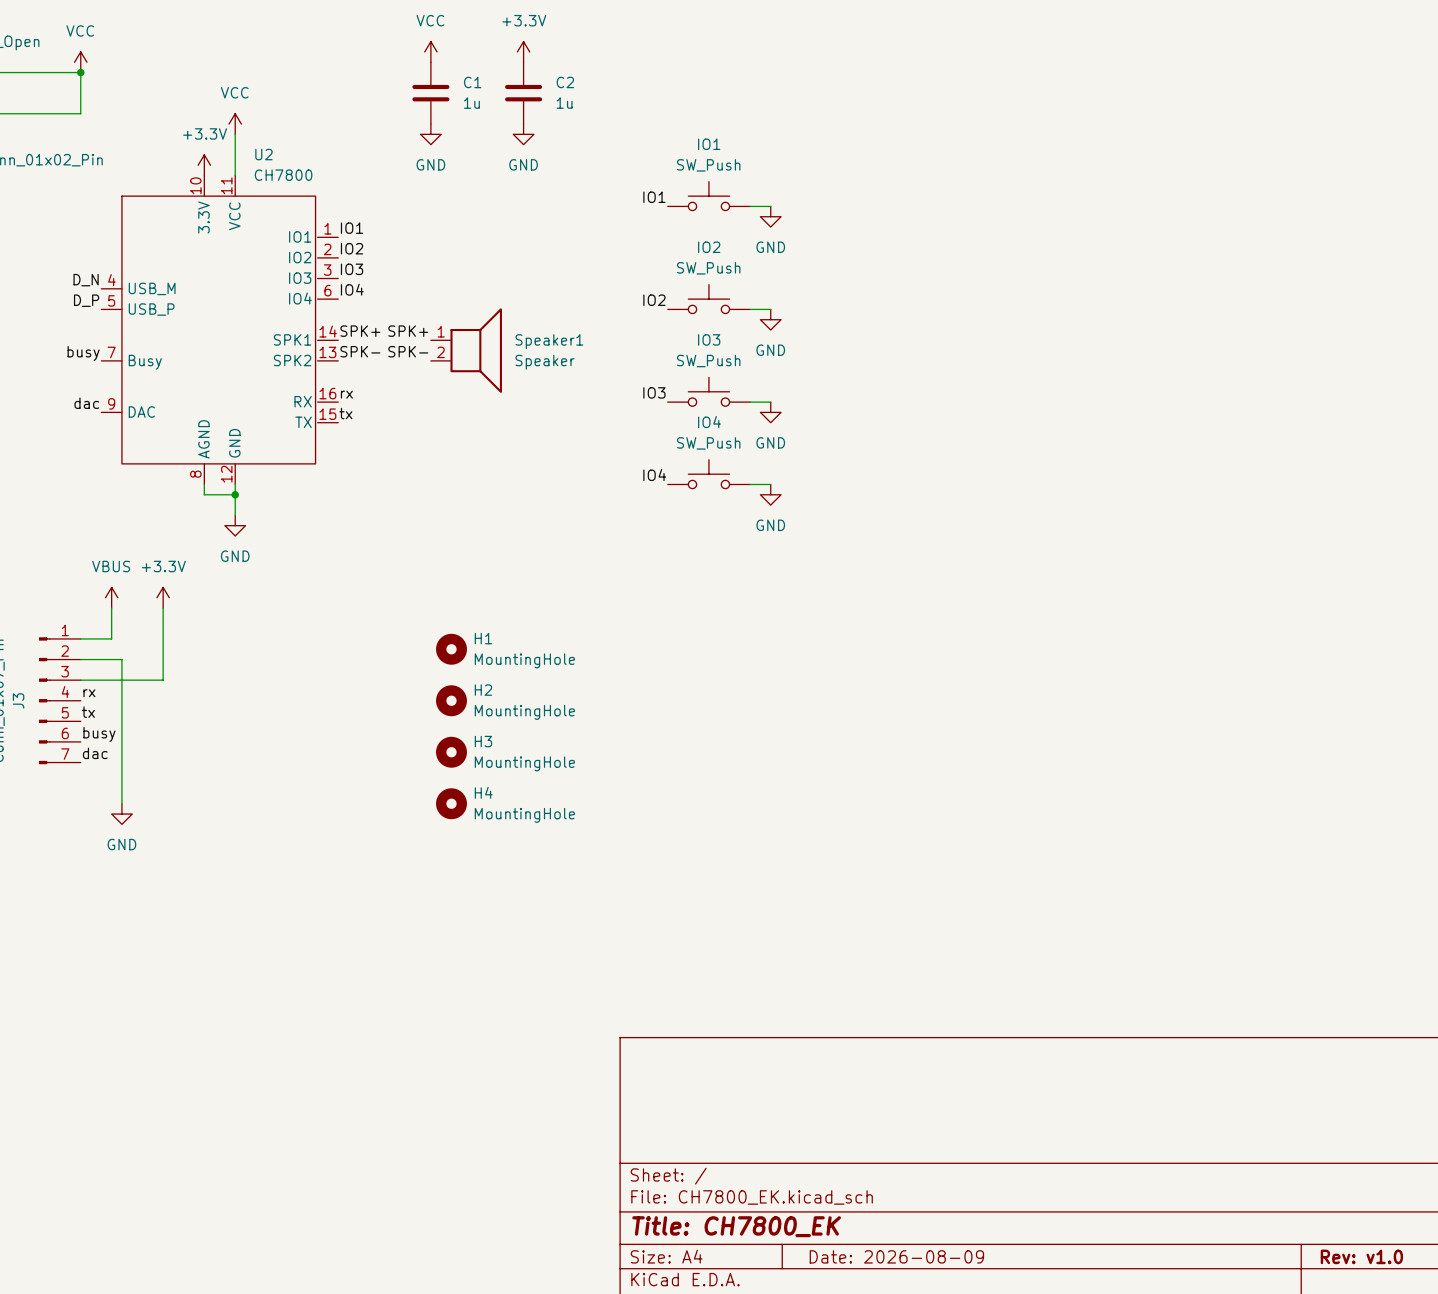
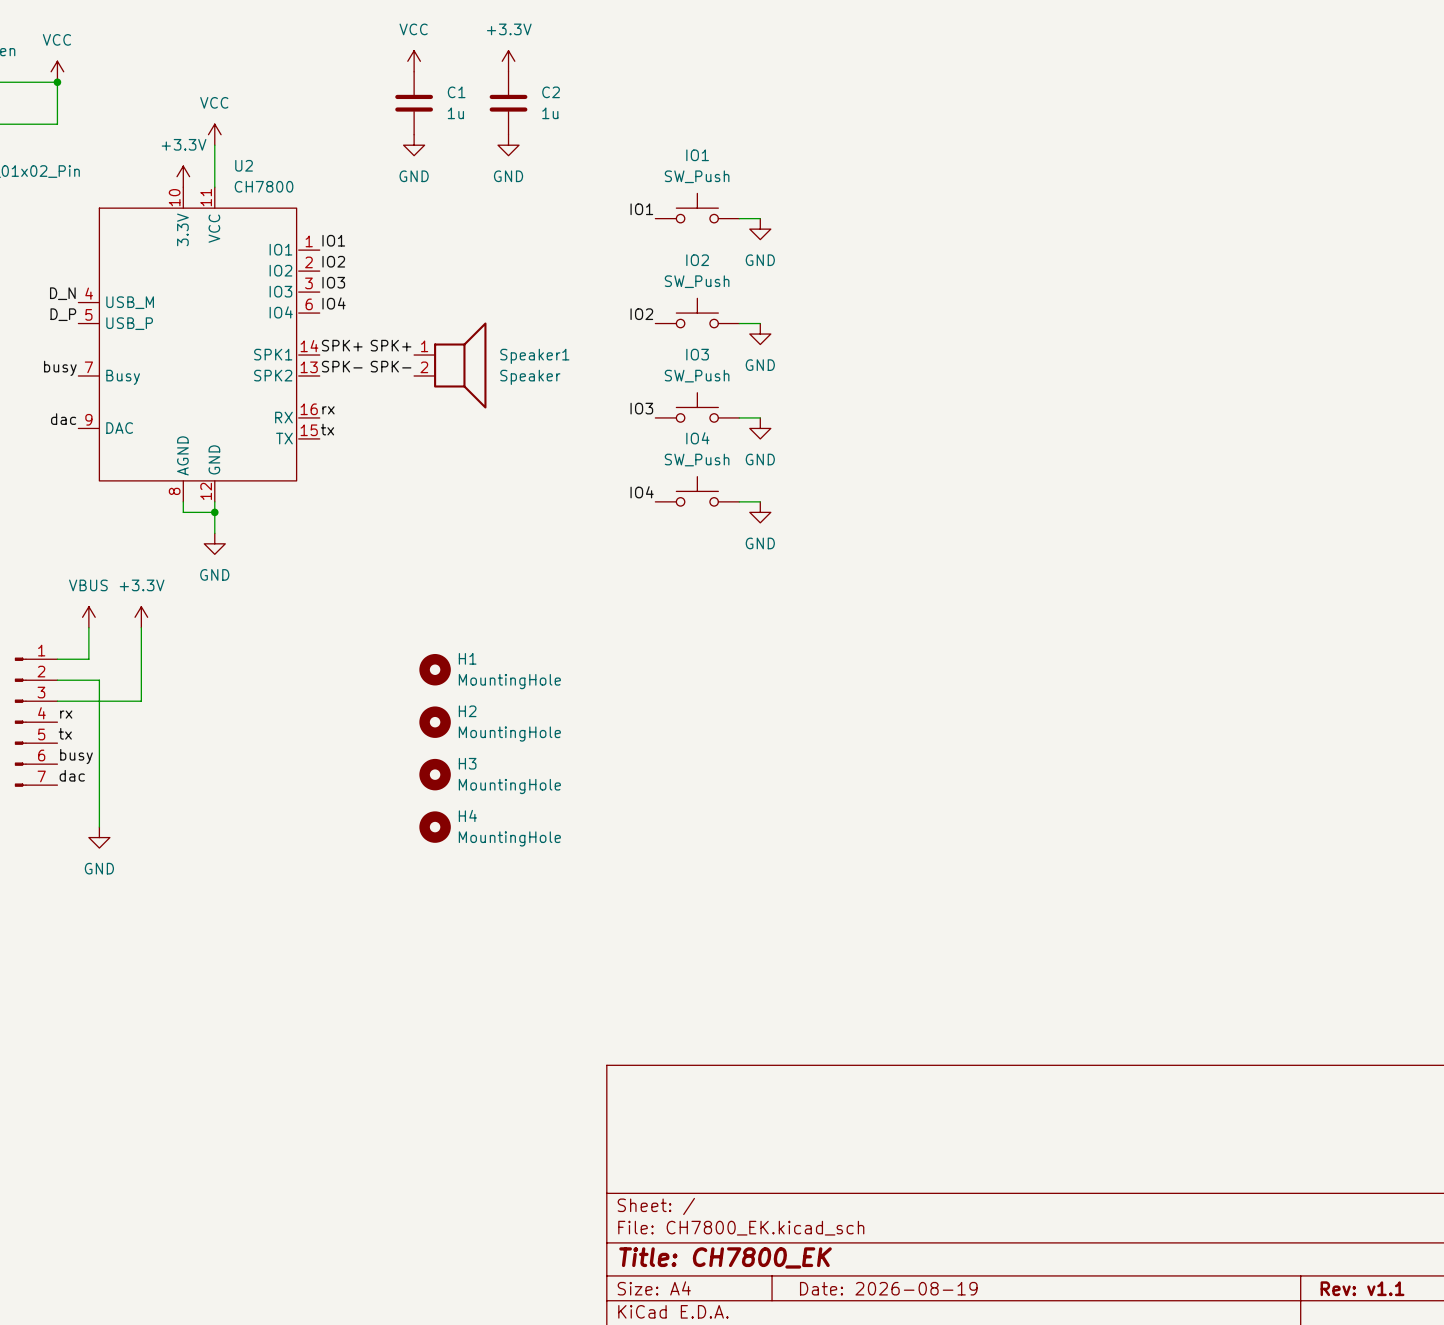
title block: Date: 2026-08-09 (896, 1256) -> Date: 2026-08-19 (888, 1288)
title block: Rev: v1.0 (1361, 1256) -> Rev: v1.1 (1362, 1288)

